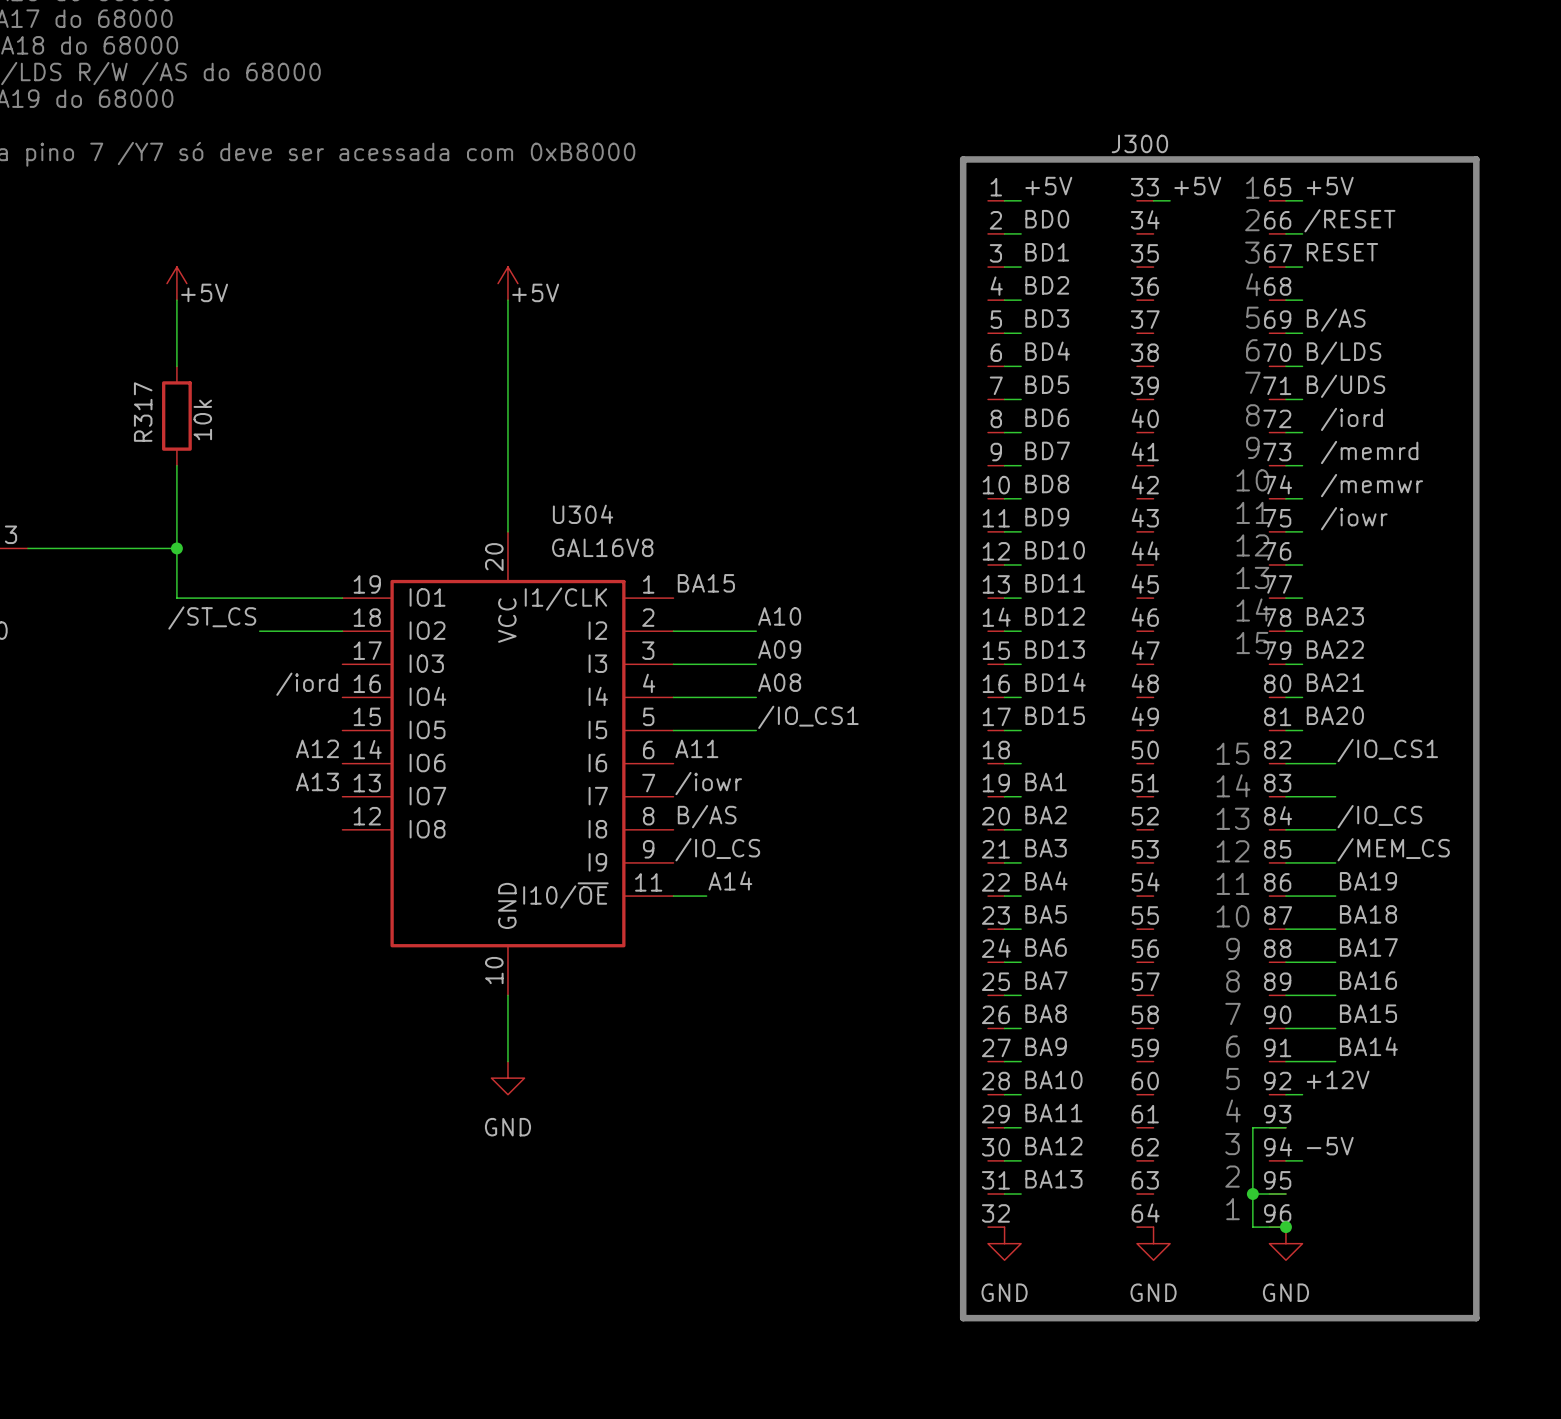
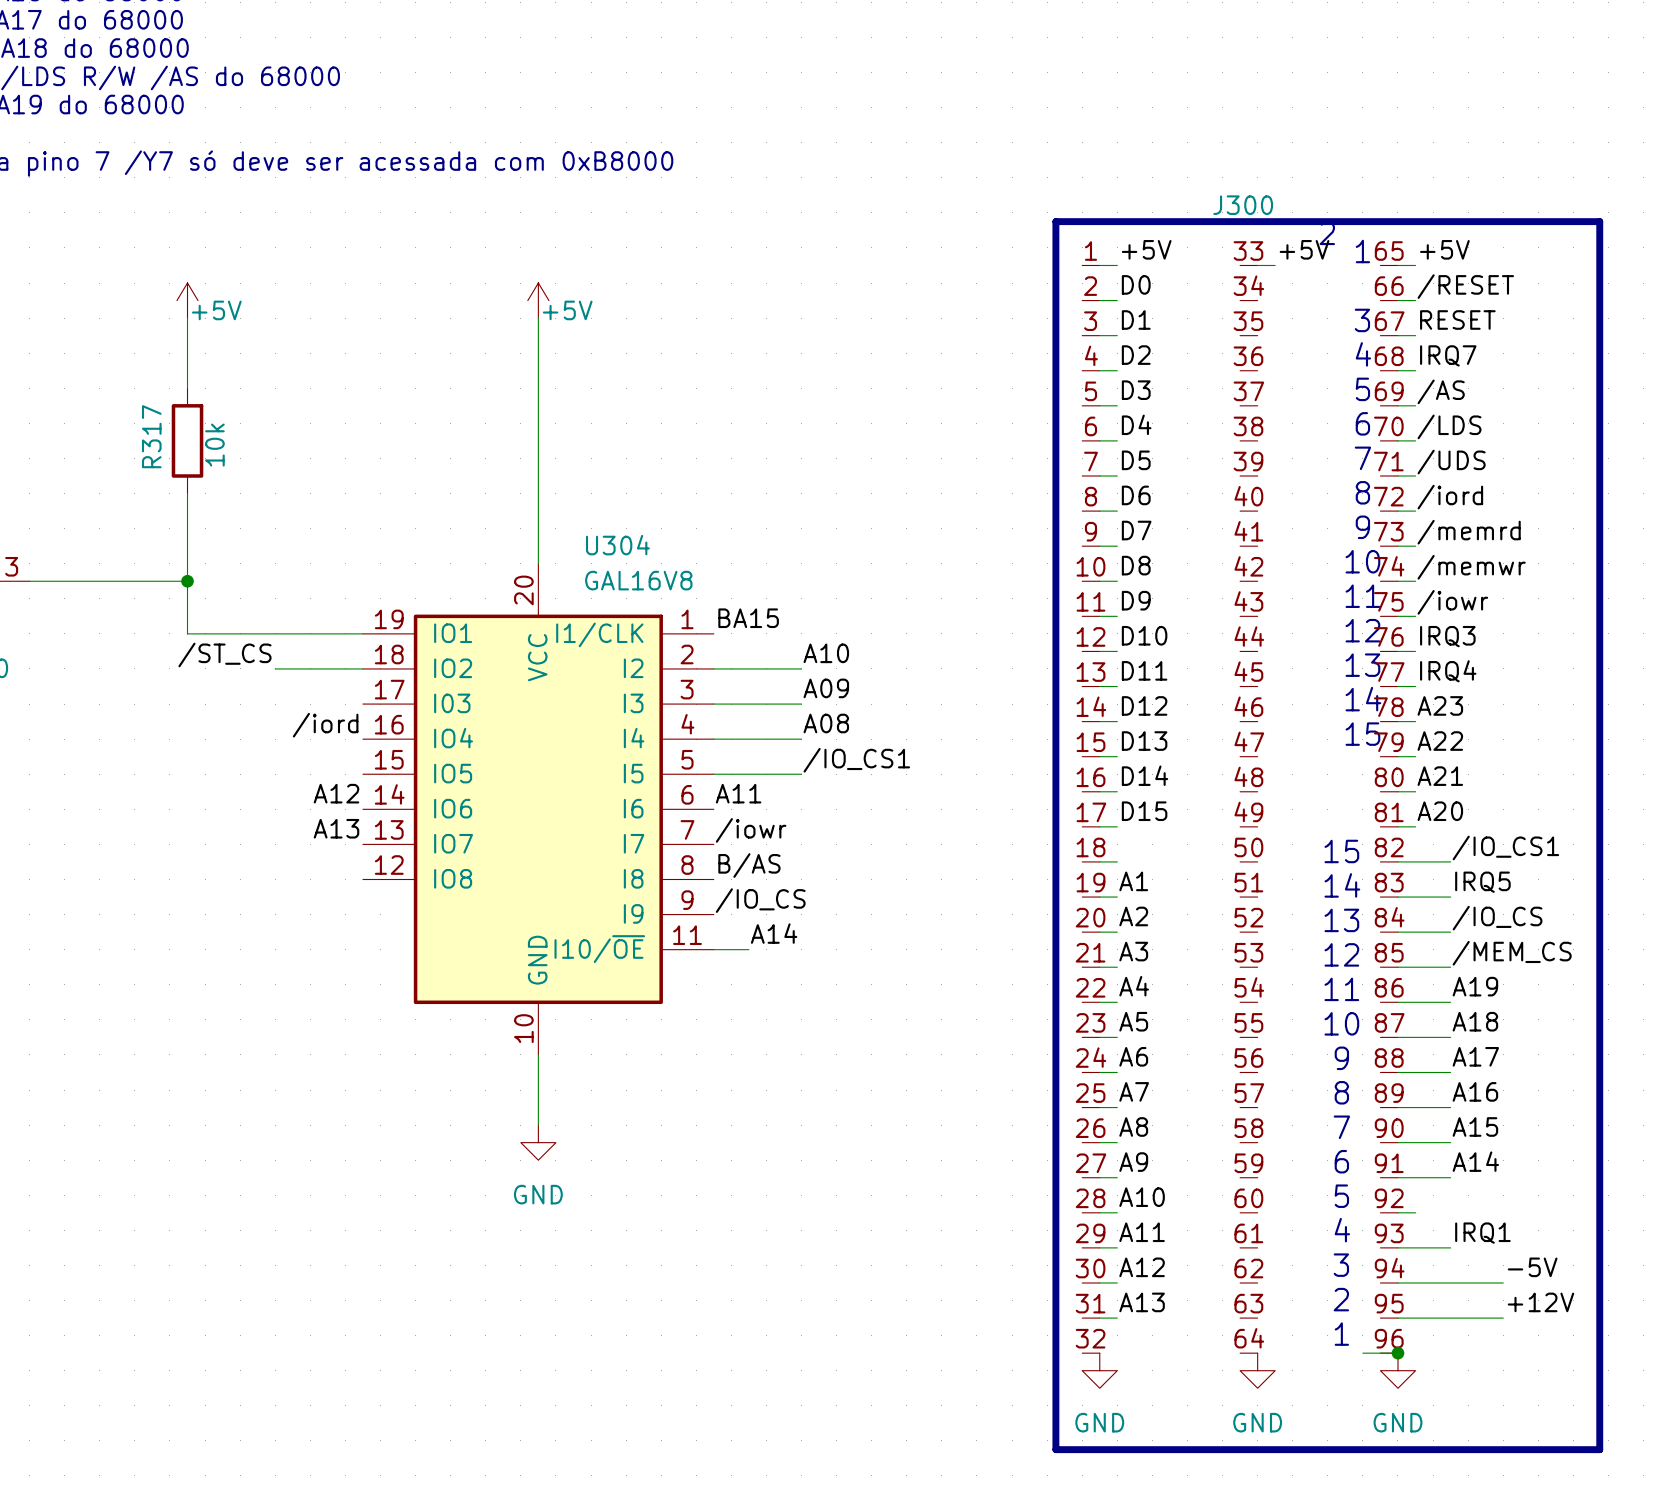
line: (963, 159) (1476, 159) (1476, 1318) (963, 1318) (963, 159) -> (1055, 221) (1599, 221) (1599, 1449) (1055, 1449) (1055, 221)
label position: +5V (1048, 186) -> +5V (1146, 249)
label: +5V (1197, 186) -> none
label: +5V (1330, 186) -> none
text position: 1 (1252, 187) -> 1 (1362, 251)
wire: (1004, 200) (1021, 200) -> (1099, 265) (1117, 265)
wire: (1153, 200) (1170, 200) -> (1257, 265) (1275, 265)
wire: (1285, 200) (1302, 200) -> (1397, 265) (1415, 265)
label: BD0 (1047, 219) -> none
label position: /RESET (1349, 220) -> /RESET (1465, 286)
wire: (1004, 233) (1021, 233) -> (1099, 300) (1117, 300)
wire: (1285, 233) (1302, 233) -> (1397, 300) (1415, 300)
label: none -> +5V (1304, 249)
label: none -> +5V (1444, 249)
label: BD1 (1047, 252) -> none
text position: 3 (1252, 252) -> 3 (1362, 320)
label position: RESET (1342, 252) -> RESET (1457, 319)
wire: (1004, 267) (1021, 267) -> (1099, 335) (1117, 335)
wire: (1285, 267) (1302, 267) -> (1397, 335) (1415, 335)
label: none -> D0 (1136, 284)
text position: 4 (1253, 284) -> 4 (1363, 354)
label: BD2 (1047, 285) -> none
wire: (1004, 300) (1021, 300) -> (1099, 370) (1117, 370)
wire: (1285, 300) (1302, 300) -> (1397, 370) (1415, 370)
label: none -> D1 (1136, 319)
text position: 5 (1252, 317) -> 5 (1362, 389)
label: BD3 (1047, 318) -> none
label: B/AS (1336, 320) -> none
wire: (1004, 333) (1021, 333) -> (1099, 405) (1117, 405)
wire: (1285, 333) (1302, 333) -> (1397, 405) (1415, 405)
label: none -> D2 (1136, 355)
label: none -> IRQ7 (1448, 355)
text position: 6 (1252, 350) -> 6 (1362, 423)
label: BD4 (1047, 351) -> none
label: B/LDS (1344, 353) -> none
wire: (1004, 366) (1021, 366) -> (1099, 440) (1117, 440)
wire: (1285, 366) (1302, 366) -> (1397, 440) (1415, 440)
label: none -> D3 (1136, 390)
label: none -> /AS (1441, 391)
text position: 7 (1252, 382) -> 7 (1362, 458)
label: BD5 (1047, 384) -> none
label: B/UDS (1346, 386) -> /LDS (1449, 426)
wire: (1004, 399) (1021, 399) -> (1099, 476) (1117, 476)
wire: (1285, 399) (1302, 399) -> (1397, 476) (1415, 476)
label: none -> D4 (1136, 424)
text position: 8 (1252, 415) -> 8 (1362, 492)
label: BD6 (1047, 417) -> none
label position: /iord (1351, 419) -> /iord (1450, 497)
wire: (1004, 432) (1021, 432) -> (1099, 511) (1117, 511)
wire: (1285, 432) (1302, 432) -> (1397, 511) (1415, 511)
label: none -> D5 (1136, 460)
label: none -> /UDS (1451, 462)
text position: 9 (1252, 447) -> 9 (1362, 527)
label: BD7 (1047, 450) -> none
label position: /memrd (1369, 452) -> /memrd (1469, 532)
wire: (1004, 465) (1021, 465) -> (1099, 546) (1117, 546)
wire: (1285, 465) (1302, 465) -> (1397, 546) (1415, 546)
label: none -> D6 (1136, 495)
text position: 10 (1252, 480) -> 10 (1362, 561)
label: BD8 (1047, 484) -> none
label position: /memwr (1372, 485) -> /memwr (1471, 567)
wire: (1004, 498) (1021, 498) -> (1099, 581) (1117, 581)
wire: (1285, 498) (1302, 498) -> (1397, 581) (1415, 581)
label: none -> D7 (1136, 530)
text position: 11 (1252, 512) -> 11 (1362, 596)
label: BD9 (1047, 517) -> none
label position: /iowr (1354, 518) -> /iowr (1452, 602)
wire: (1004, 531) (1021, 531) -> (1099, 616) (1117, 616)
wire: (1285, 531) (1302, 531) -> (1397, 616) (1415, 616)
label: none -> D8 (1136, 565)
text position: 12 (1252, 545) -> 12 (1362, 630)
label: BD10 (1055, 550) -> none
wire: (1004, 565) (1021, 565) -> (1099, 651) (1117, 651)
wire: (1285, 565) (1302, 565) -> (1397, 651) (1415, 651)
label: none -> D9 (1136, 600)
text position: 13 (1252, 577) -> 13 (1362, 665)
label: BD11 (1055, 583) -> none
wire: (1004, 598) (1021, 598) -> (1099, 686) (1117, 686)
wire: (1285, 598) (1302, 598) -> (1397, 686) (1415, 686)
label: none -> D10 (1144, 635)
label: none -> IRQ3 (1447, 636)
text position: 14 (1253, 609) -> 14 (1363, 699)
label: BD12 (1055, 616) -> none
label: BA23 (1335, 616) -> none
wire: (1004, 631) (1021, 631) -> (1099, 721) (1117, 721)
wire: (1285, 631) (1302, 631) -> (1397, 721) (1415, 721)
label: none -> D11 (1144, 670)
label: none -> IRQ4 (1448, 671)
text: 15 (1252, 643) -> none
label: BD13 (1055, 649) -> none
label: BA22 (1335, 649) -> none
wire: (1004, 664) (1021, 664) -> (1099, 756) (1117, 756)
wire: (1285, 664) (1302, 664) -> (1397, 756) (1415, 756)
label: none -> D12 (1144, 705)
label: none -> A23 (1440, 705)
label: BD14 (1055, 682) -> none
label: BA21 (1335, 682) -> none
text: none -> 15 (1362, 734)
wire: (1004, 697) (1021, 697) -> (1099, 791) (1117, 791)
wire: (1285, 697) (1302, 697) -> (1397, 791) (1415, 791)
label: none -> D13 (1144, 741)
label: none -> A22 (1440, 741)
J300 position: (1136, 713) -> (1240, 809)
label: BD15 (1055, 715) -> none
label: BA20 (1335, 715) -> none
wire: (1004, 730) (1021, 730) -> (1099, 826) (1117, 826)
wire: (1285, 730) (1302, 730) -> (1397, 826) (1415, 826)
label: none -> D14 (1145, 775)
label: none -> A21 (1440, 776)
label position: /IO_CS1 (1387, 750) -> /IO_CS1 (1505, 847)
text: 15 (1233, 753) -> none
wire: (1004, 763) (1021, 763) -> (1099, 861) (1117, 861)
wire: (1285, 763) (1335, 763) -> (1397, 861) (1450, 861)
label: none -> D15 (1144, 811)
label: none -> A20 (1440, 811)
label: BA1 (1046, 781) -> none
text position: 14 (1233, 785) -> 14 (1342, 885)
wire: (1004, 796) (1021, 796) -> (1099, 897) (1117, 897)
wire: (1285, 796) (1335, 796) -> (1397, 897) (1450, 897)
text: none -> 15 (1341, 851)
label: BA2 (1046, 815) -> none
label position: /IO_CS (1379, 816) -> /IO_CS (1497, 918)
text position: 13 (1233, 818) -> 13 (1341, 920)
wire: (1004, 829) (1021, 829) -> (1099, 932) (1117, 932)
wire: (1285, 829) (1335, 829) -> (1397, 932) (1450, 932)
label: none -> A1 (1133, 881)
label: none -> IRQ5 (1482, 882)
label: BA3 (1046, 848) -> none
label position: /MEM_CS (1393, 849) -> /MEM_CS (1512, 953)
text position: 12 (1233, 851) -> 12 (1341, 954)
wire: (1004, 862) (1021, 862) -> (1099, 967) (1117, 967)
wire: (1285, 862) (1335, 862) -> (1397, 967) (1450, 967)
label: none -> A2 (1133, 916)
label: BA4 (1046, 880) -> none
label: BA19 (1368, 881) -> none
text position: 11 (1233, 883) -> 11 (1341, 989)
wire: (1004, 896) (1021, 896) -> (1099, 1002) (1117, 1002)
wire: (1285, 896) (1335, 896) -> (1397, 1002) (1450, 1002)
label: none -> A3 (1133, 951)
label: BA5 (1046, 914) -> none
label: BA18 (1368, 914) -> none
text position: 10 (1233, 916) -> 10 (1341, 1023)
wire: (1004, 929) (1021, 929) -> (1099, 1037) (1117, 1037)
wire: (1285, 929) (1335, 929) -> (1397, 1037) (1450, 1037)
label: none -> A4 (1134, 986)
label: none -> A19 (1475, 986)
label: BA6 (1046, 947) -> none
label: BA17 (1368, 947) -> none
text position: 9 (1233, 948) -> 9 (1341, 1058)
wire: (1004, 962) (1021, 962) -> (1099, 1072) (1117, 1072)
wire: (1285, 962) (1335, 962) -> (1397, 1072) (1450, 1072)
label: none -> A5 (1133, 1021)
label: none -> A18 (1475, 1021)
label: BA7 (1046, 980) -> none
label: BA16 (1368, 980) -> none
text position: 8 (1233, 981) -> 8 (1341, 1092)
wire: (1004, 995) (1021, 995) -> (1099, 1107) (1117, 1107)
wire: (1285, 995) (1335, 995) -> (1397, 1107) (1450, 1107)
label: none -> A6 (1133, 1056)
label: none -> A17 (1475, 1056)
label: BA8 (1046, 1013) -> none
text position: 7 (1233, 1013) -> 7 (1341, 1127)
label: BA15 (1368, 1013) -> none
wire: (1004, 1028) (1021, 1028) -> (1099, 1142) (1117, 1142)
wire: (1285, 1028) (1335, 1028) -> (1397, 1142) (1450, 1142)
label: none -> A7 (1134, 1091)
label: none -> A16 (1475, 1091)
label: BA9 (1046, 1046) -> none
text position: 6 (1233, 1046) -> 6 (1341, 1161)
label: BA14 (1368, 1046) -> none
wire: (1004, 1061) (1021, 1061) -> (1099, 1177) (1117, 1177)
wire: (1285, 1061) (1335, 1061) -> (1397, 1177) (1450, 1177)
label: none -> A8 (1133, 1126)
label: none -> A15 (1475, 1126)
label: BA10 (1053, 1079) -> none
text position: 5 (1233, 1079) -> 5 (1341, 1196)
label position: +12V (1338, 1079) -> +12V (1540, 1302)
wire: (1004, 1094) (1021, 1094) -> (1099, 1212) (1117, 1212)
wire: (1285, 1094) (1302, 1094) -> (1397, 1212) (1415, 1212)
label: none -> A9 (1133, 1162)
label: none -> A14 (1475, 1161)
text position: 4 (1233, 1111) -> 4 (1342, 1230)
label: BA11 (1053, 1113) -> none
wire: (1004, 1127) (1021, 1127) -> (1099, 1247) (1117, 1247)
wire: (1285, 1127) (1252, 1127) (1252, 1227) (1285, 1227) -> none
label: none -> A10 (1142, 1197)
text position: 3 (1232, 1144) -> 3 (1341, 1265)
label: BA12 (1053, 1146) -> none
label position: -5V (1330, 1146) -> -5V (1532, 1267)
wire: (1004, 1160) (1021, 1160) -> (1099, 1282) (1117, 1282)
wire: (1285, 1160) (1302, 1160) -> none
label: none -> A11 (1142, 1232)
label: none -> IRQ1 (1482, 1233)
text position: 2 (1232, 1176) -> 2 (1341, 1299)
wire: none -> (1397, 1247) (1450, 1247)
label: BA13 (1053, 1179) -> none
wire: (1004, 1194) (1021, 1194) -> (1099, 1318) (1117, 1318)
wire: (1252, 1194) (1285, 1194) -> (1362, 1353) (1397, 1353)
junction: (1252, 1194) -> none
label: none -> A12 (1142, 1267)
text position: 1 (1233, 1209) -> 1 (1341, 1334)
wire: none -> (1397, 1282) (1503, 1282)
junction: (1285, 1227) -> none
label: none -> A13 (1142, 1302)
power symbol position: GND (1004, 1243) -> GND (1099, 1370)
power symbol: GND (1153, 1243) -> none
power symbol: GND (1285, 1243) -> none
wire: none -> (1397, 1318) (1503, 1318)
junction: none -> (1397, 1353)
power symbol: none -> GND (1257, 1370)
power symbol: none -> GND (1397, 1370)

